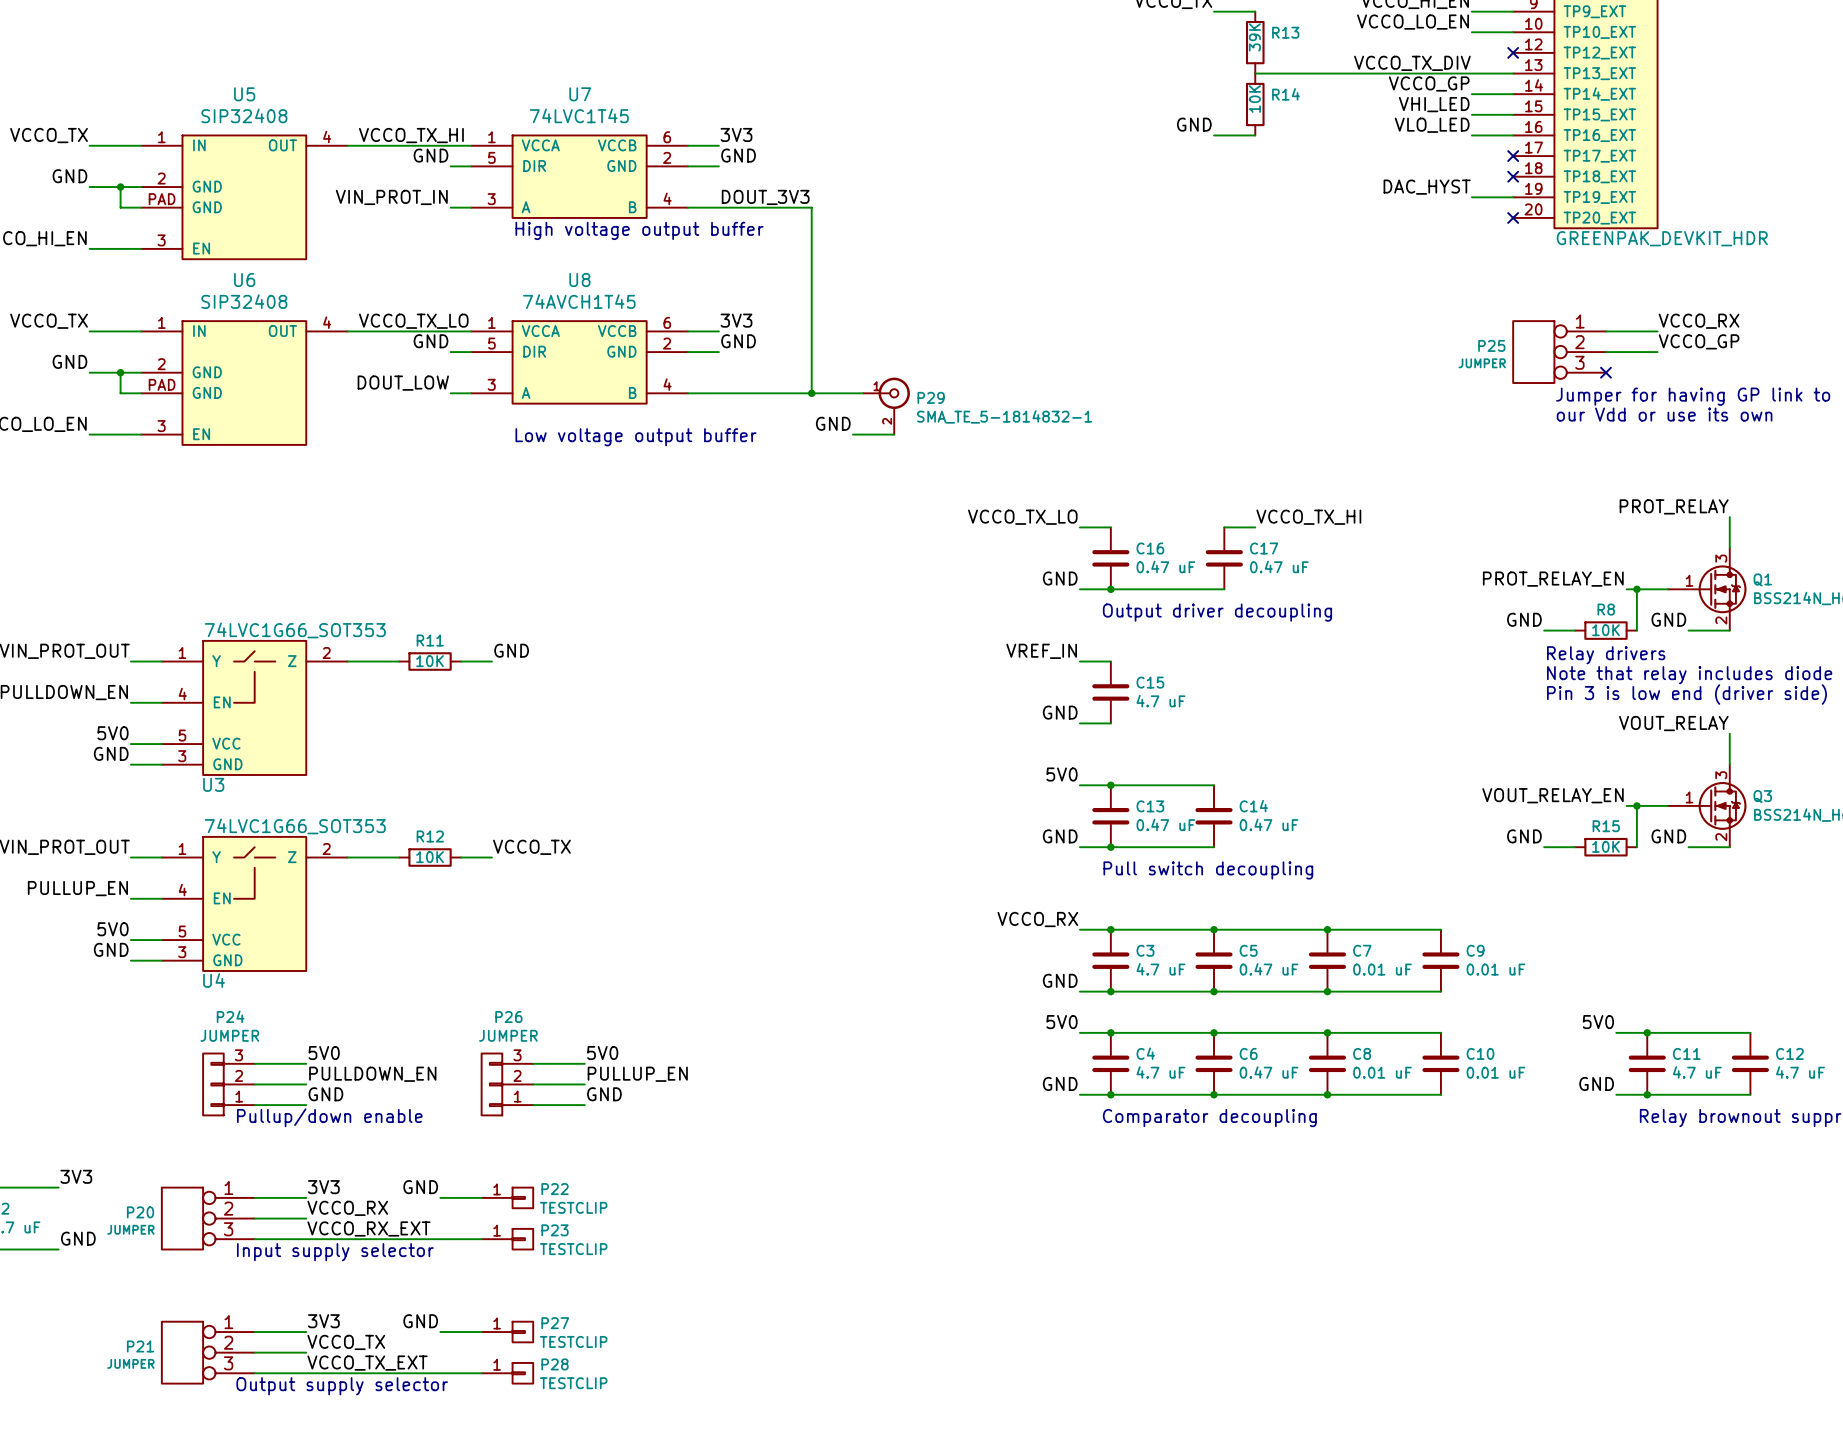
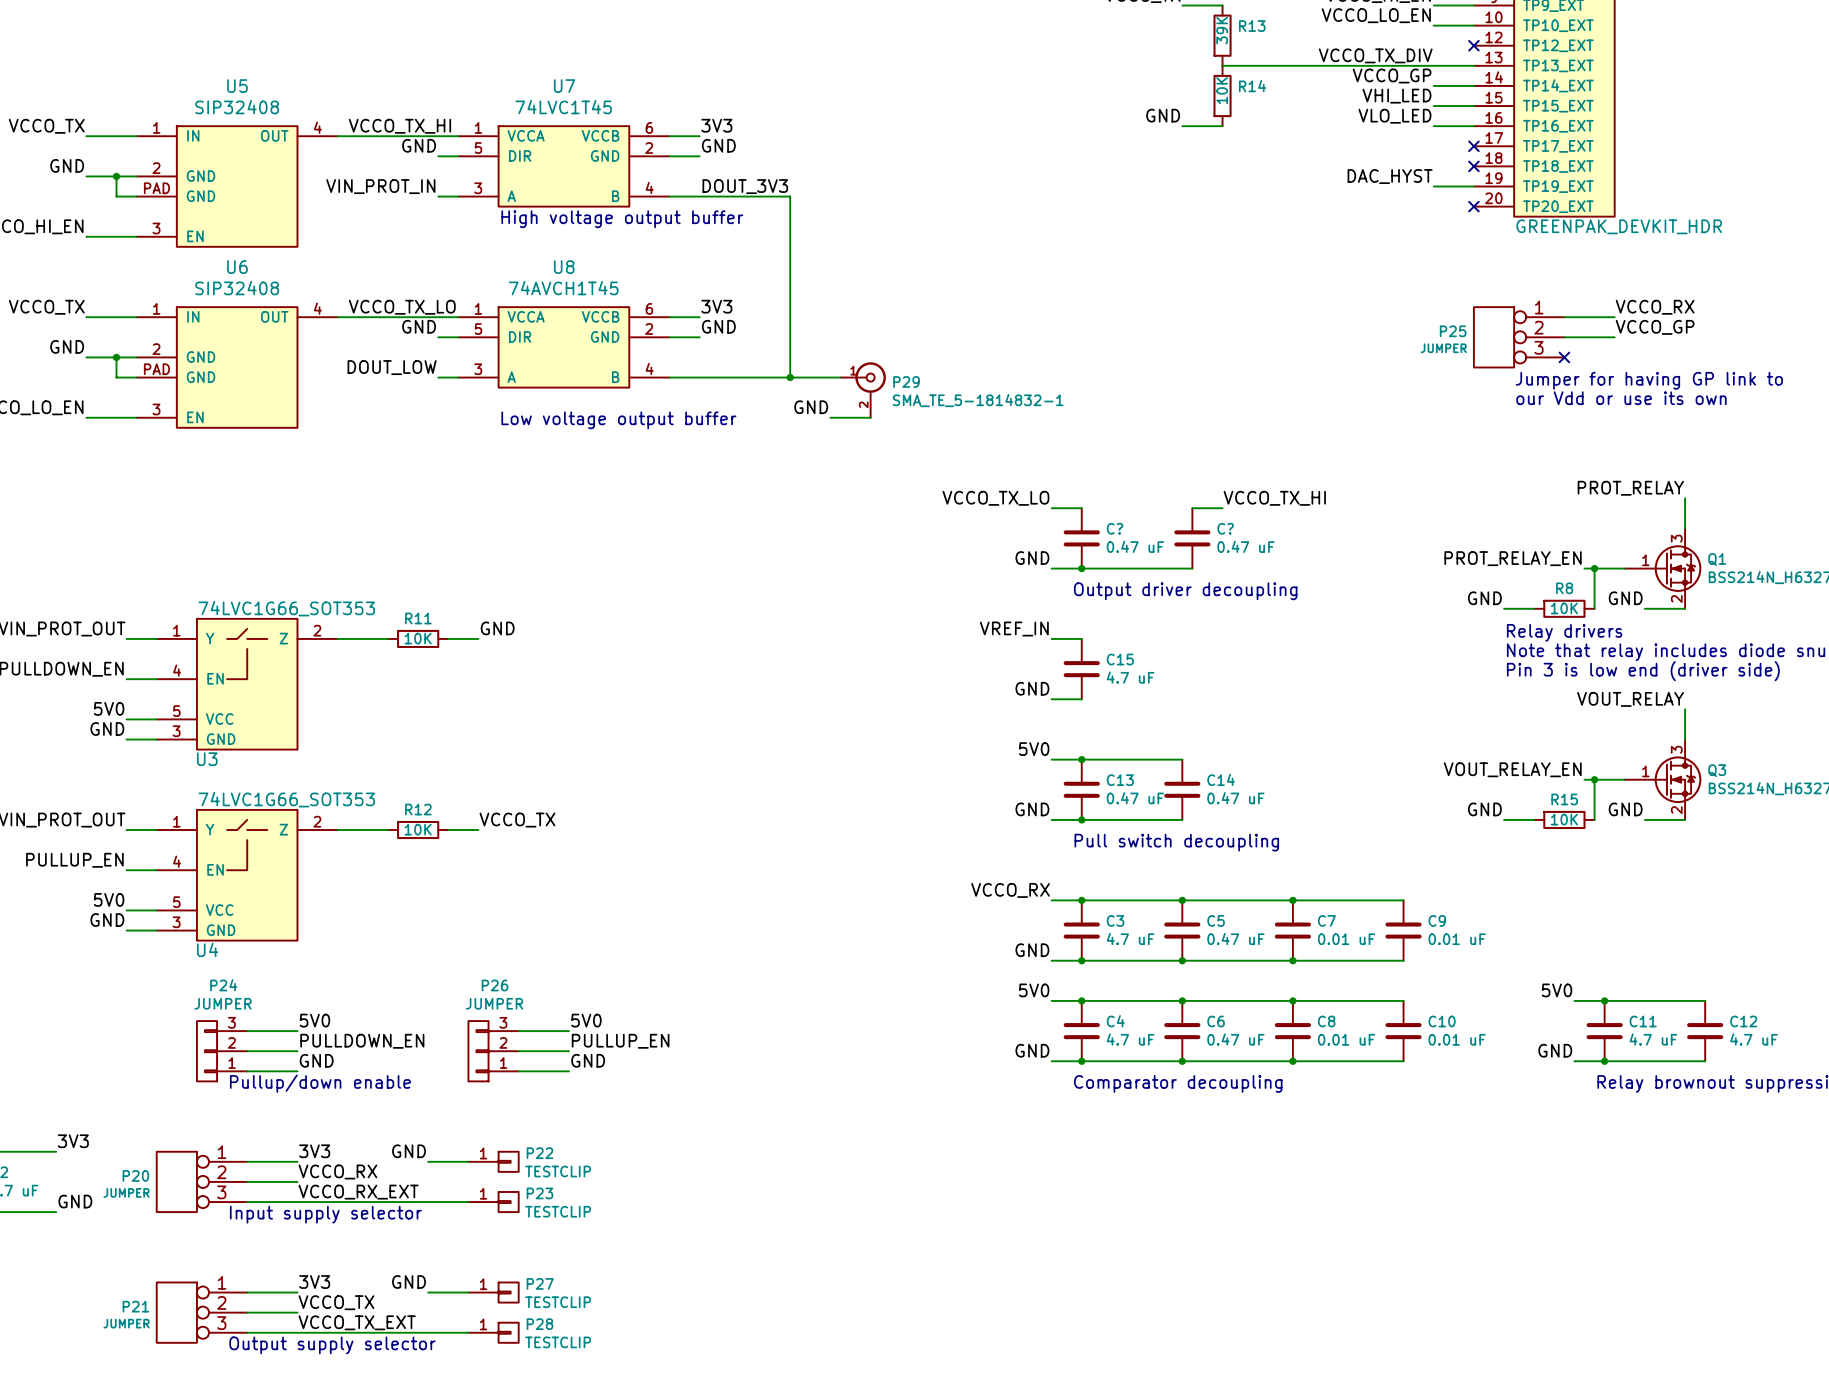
C16 name: C16 (1150, 548) -> C? (1115, 528)
C17 name: C17 (1264, 548) -> C? (1225, 528)

